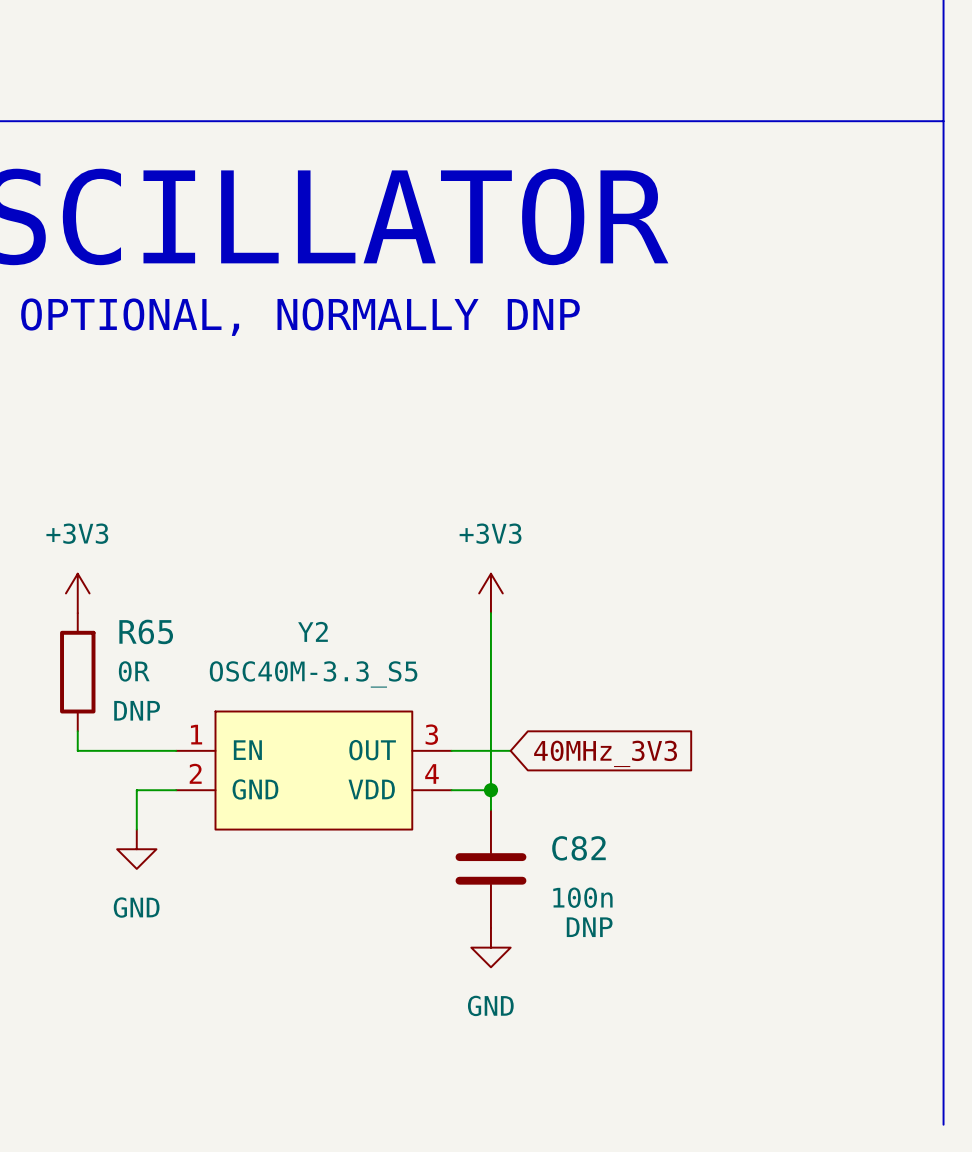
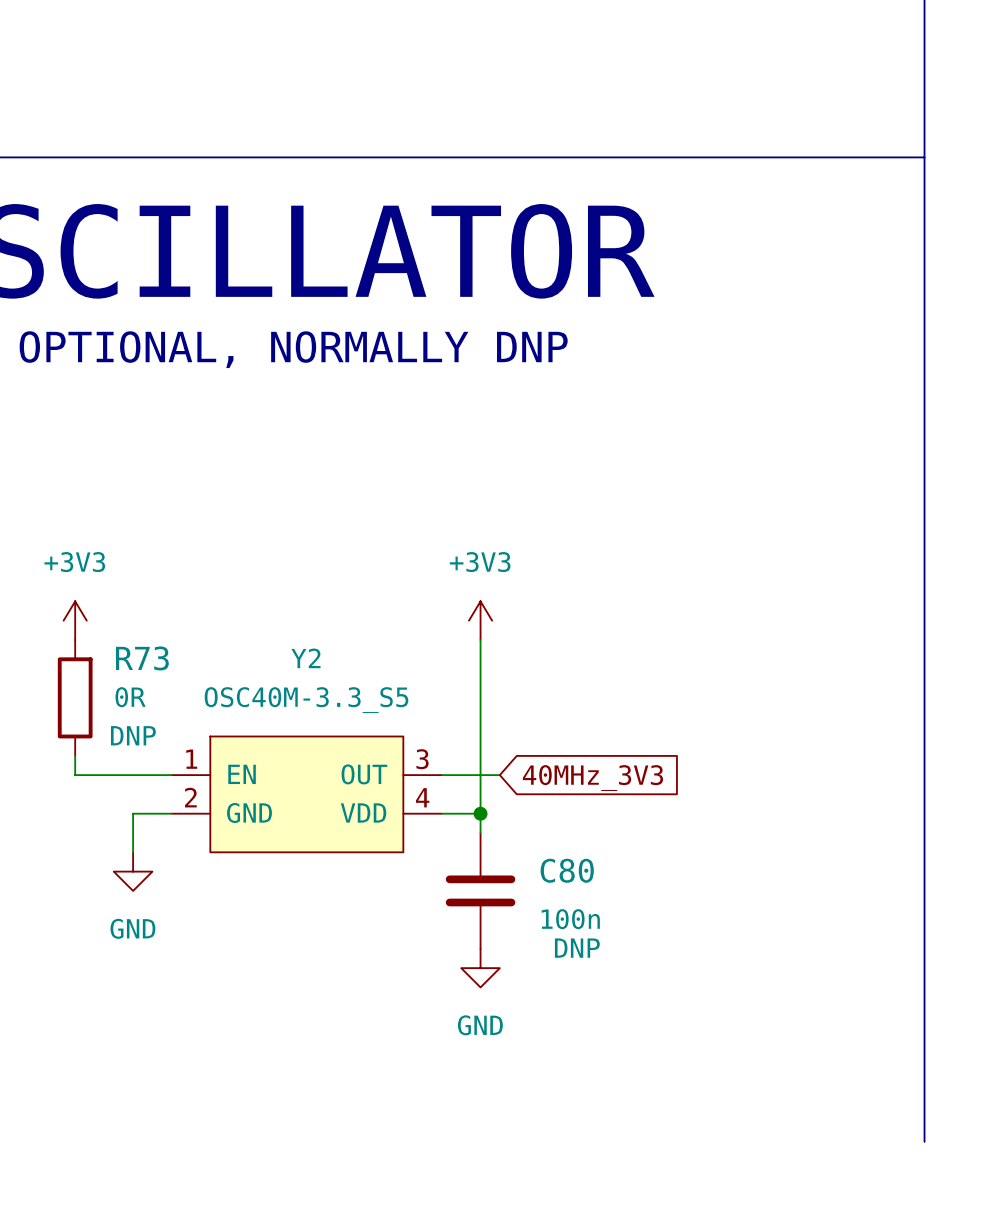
R65 name: R65 (146, 631) -> R73 (142, 658)
C82 name: C82 (578, 848) -> C80 (567, 870)

